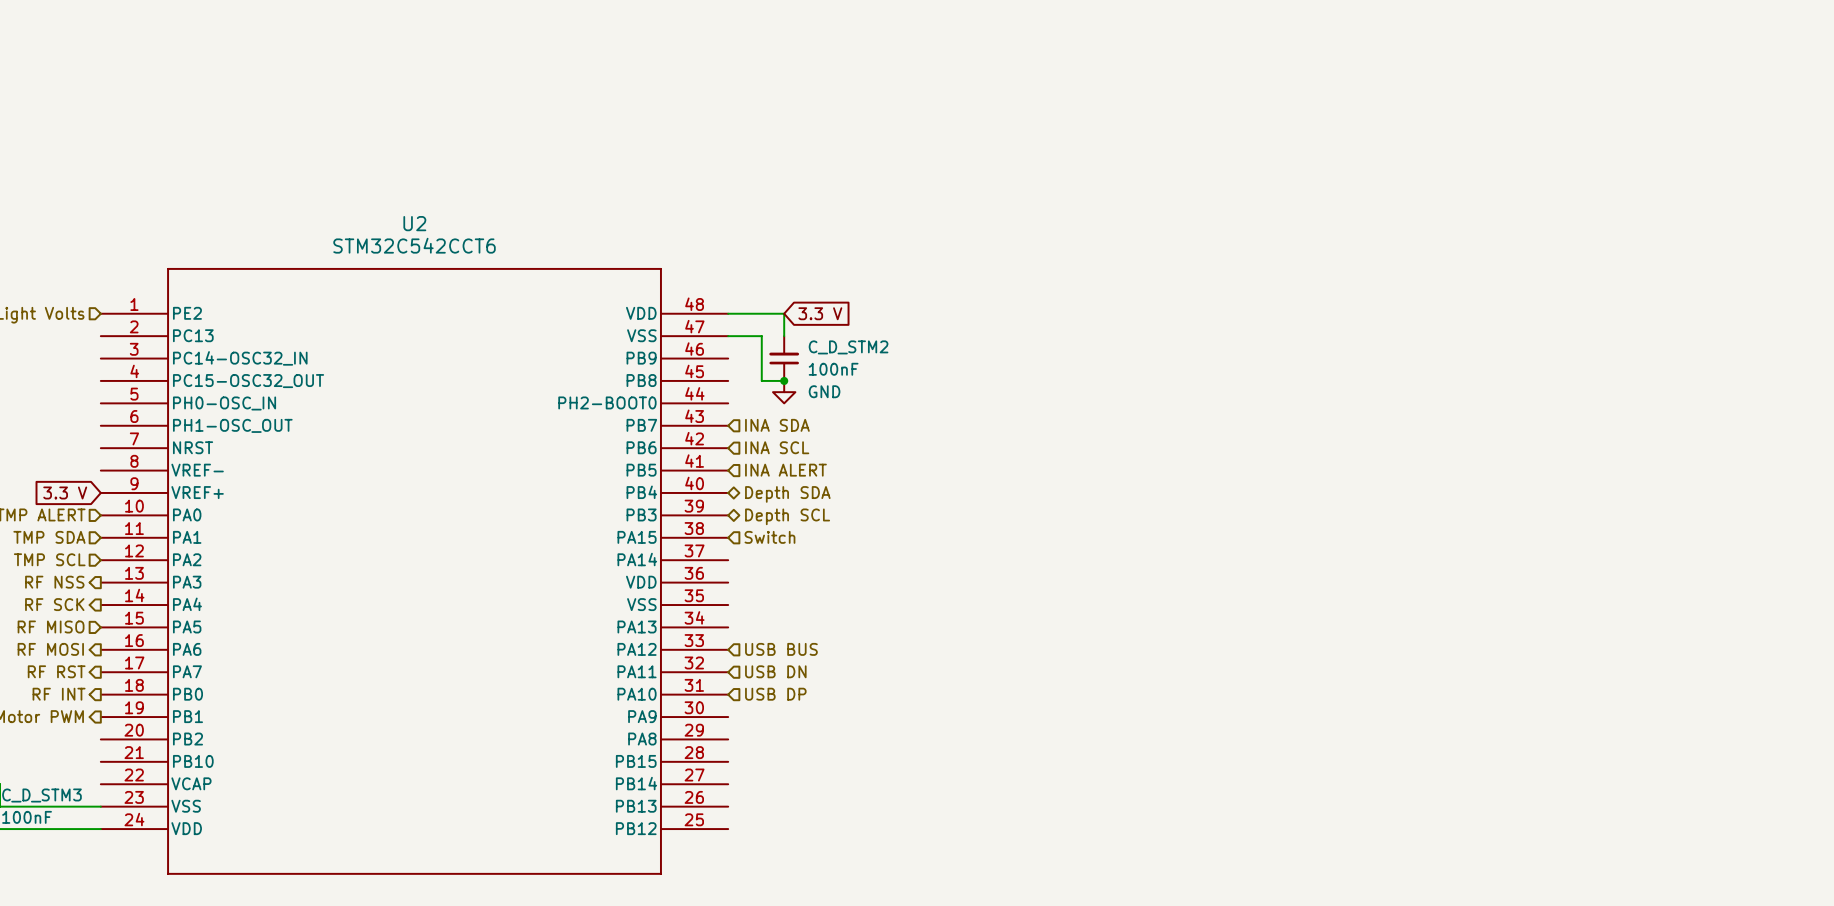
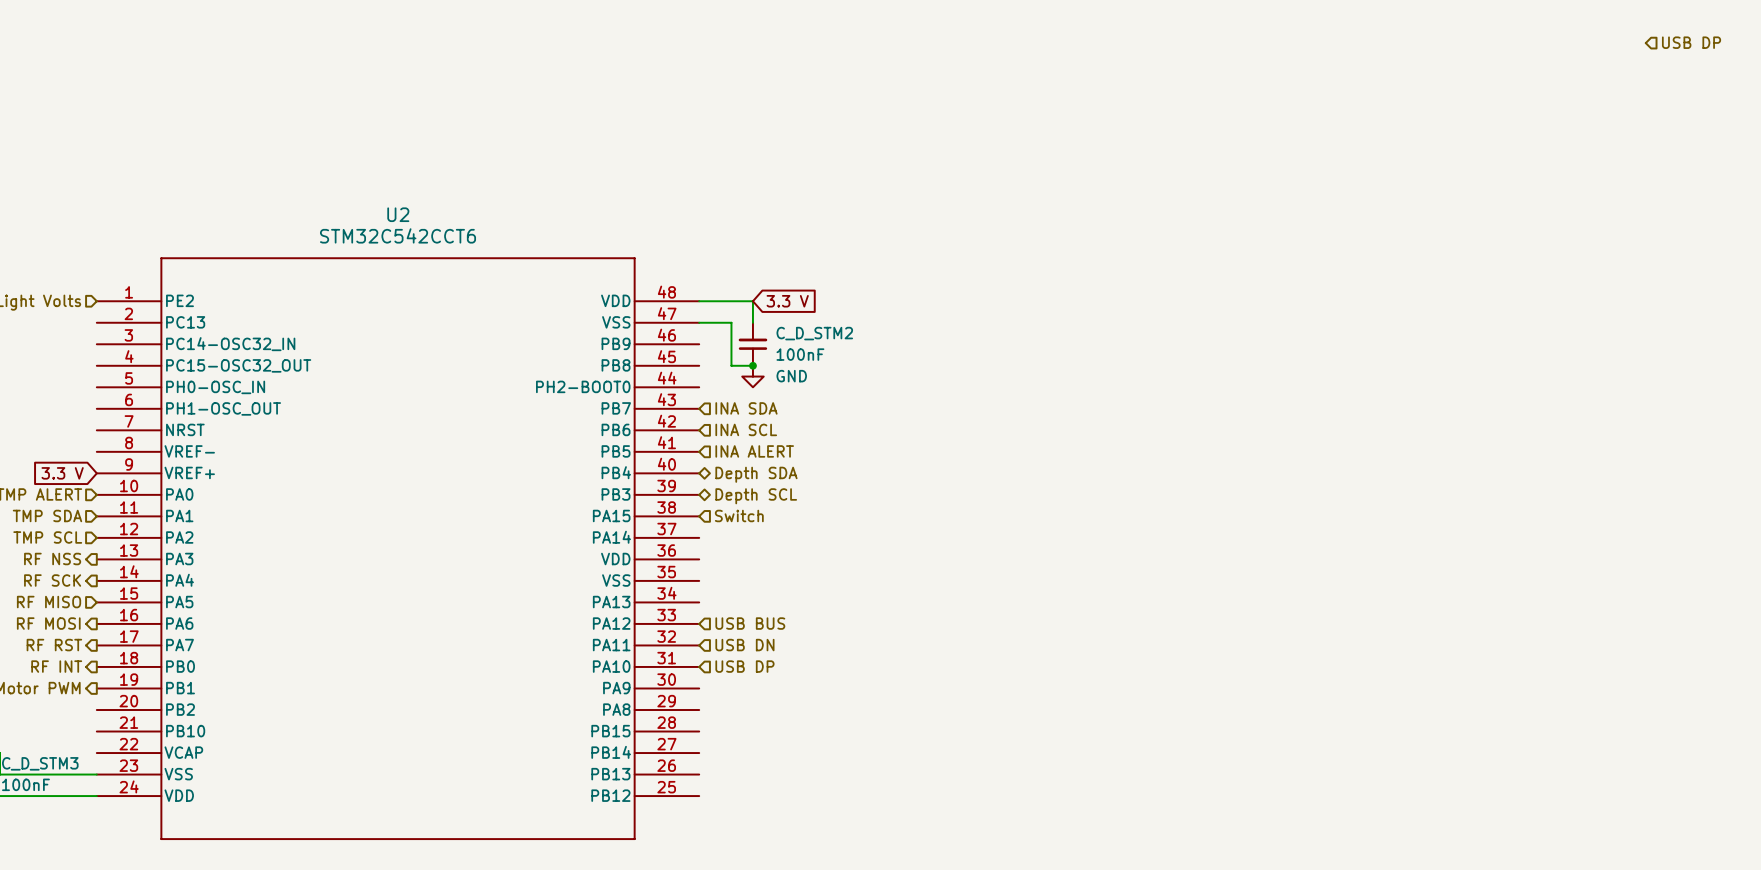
hierarchical label: none -> USB DP (1691, 42)

